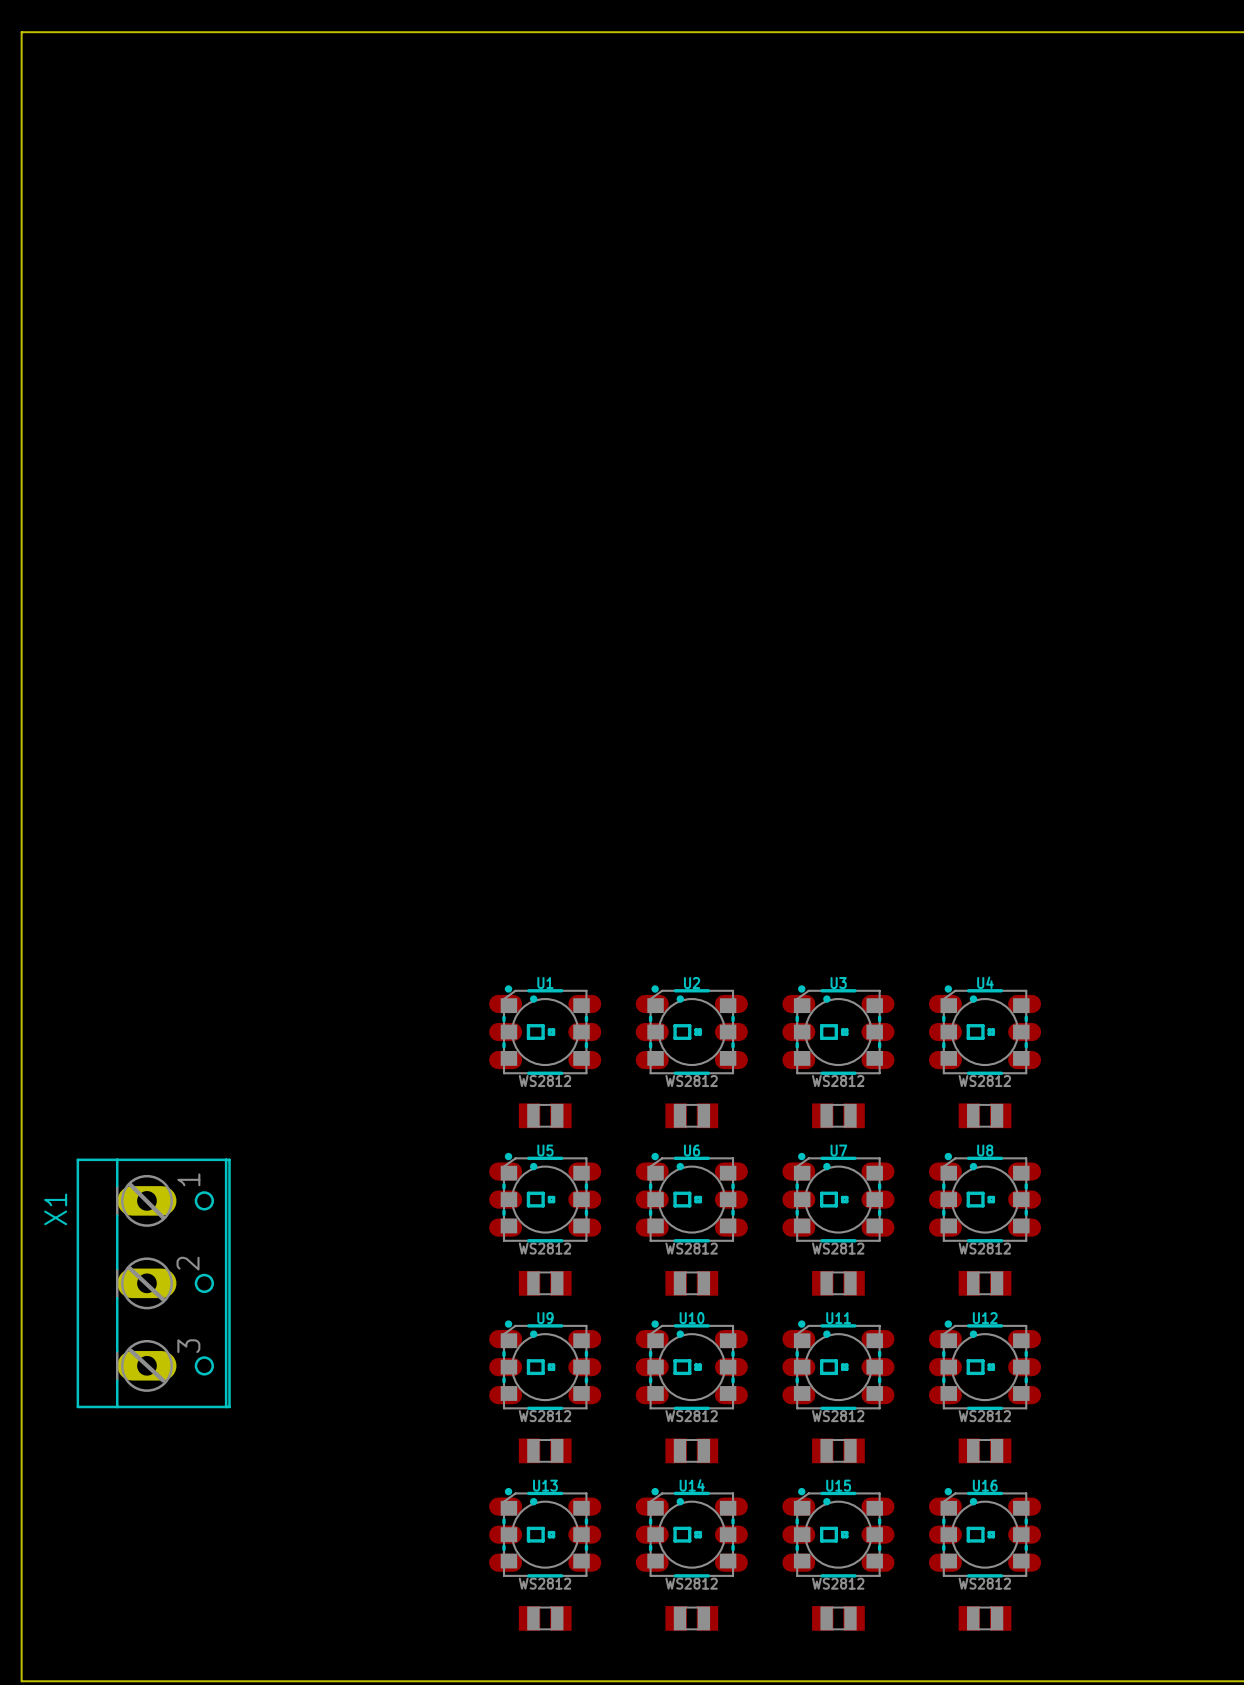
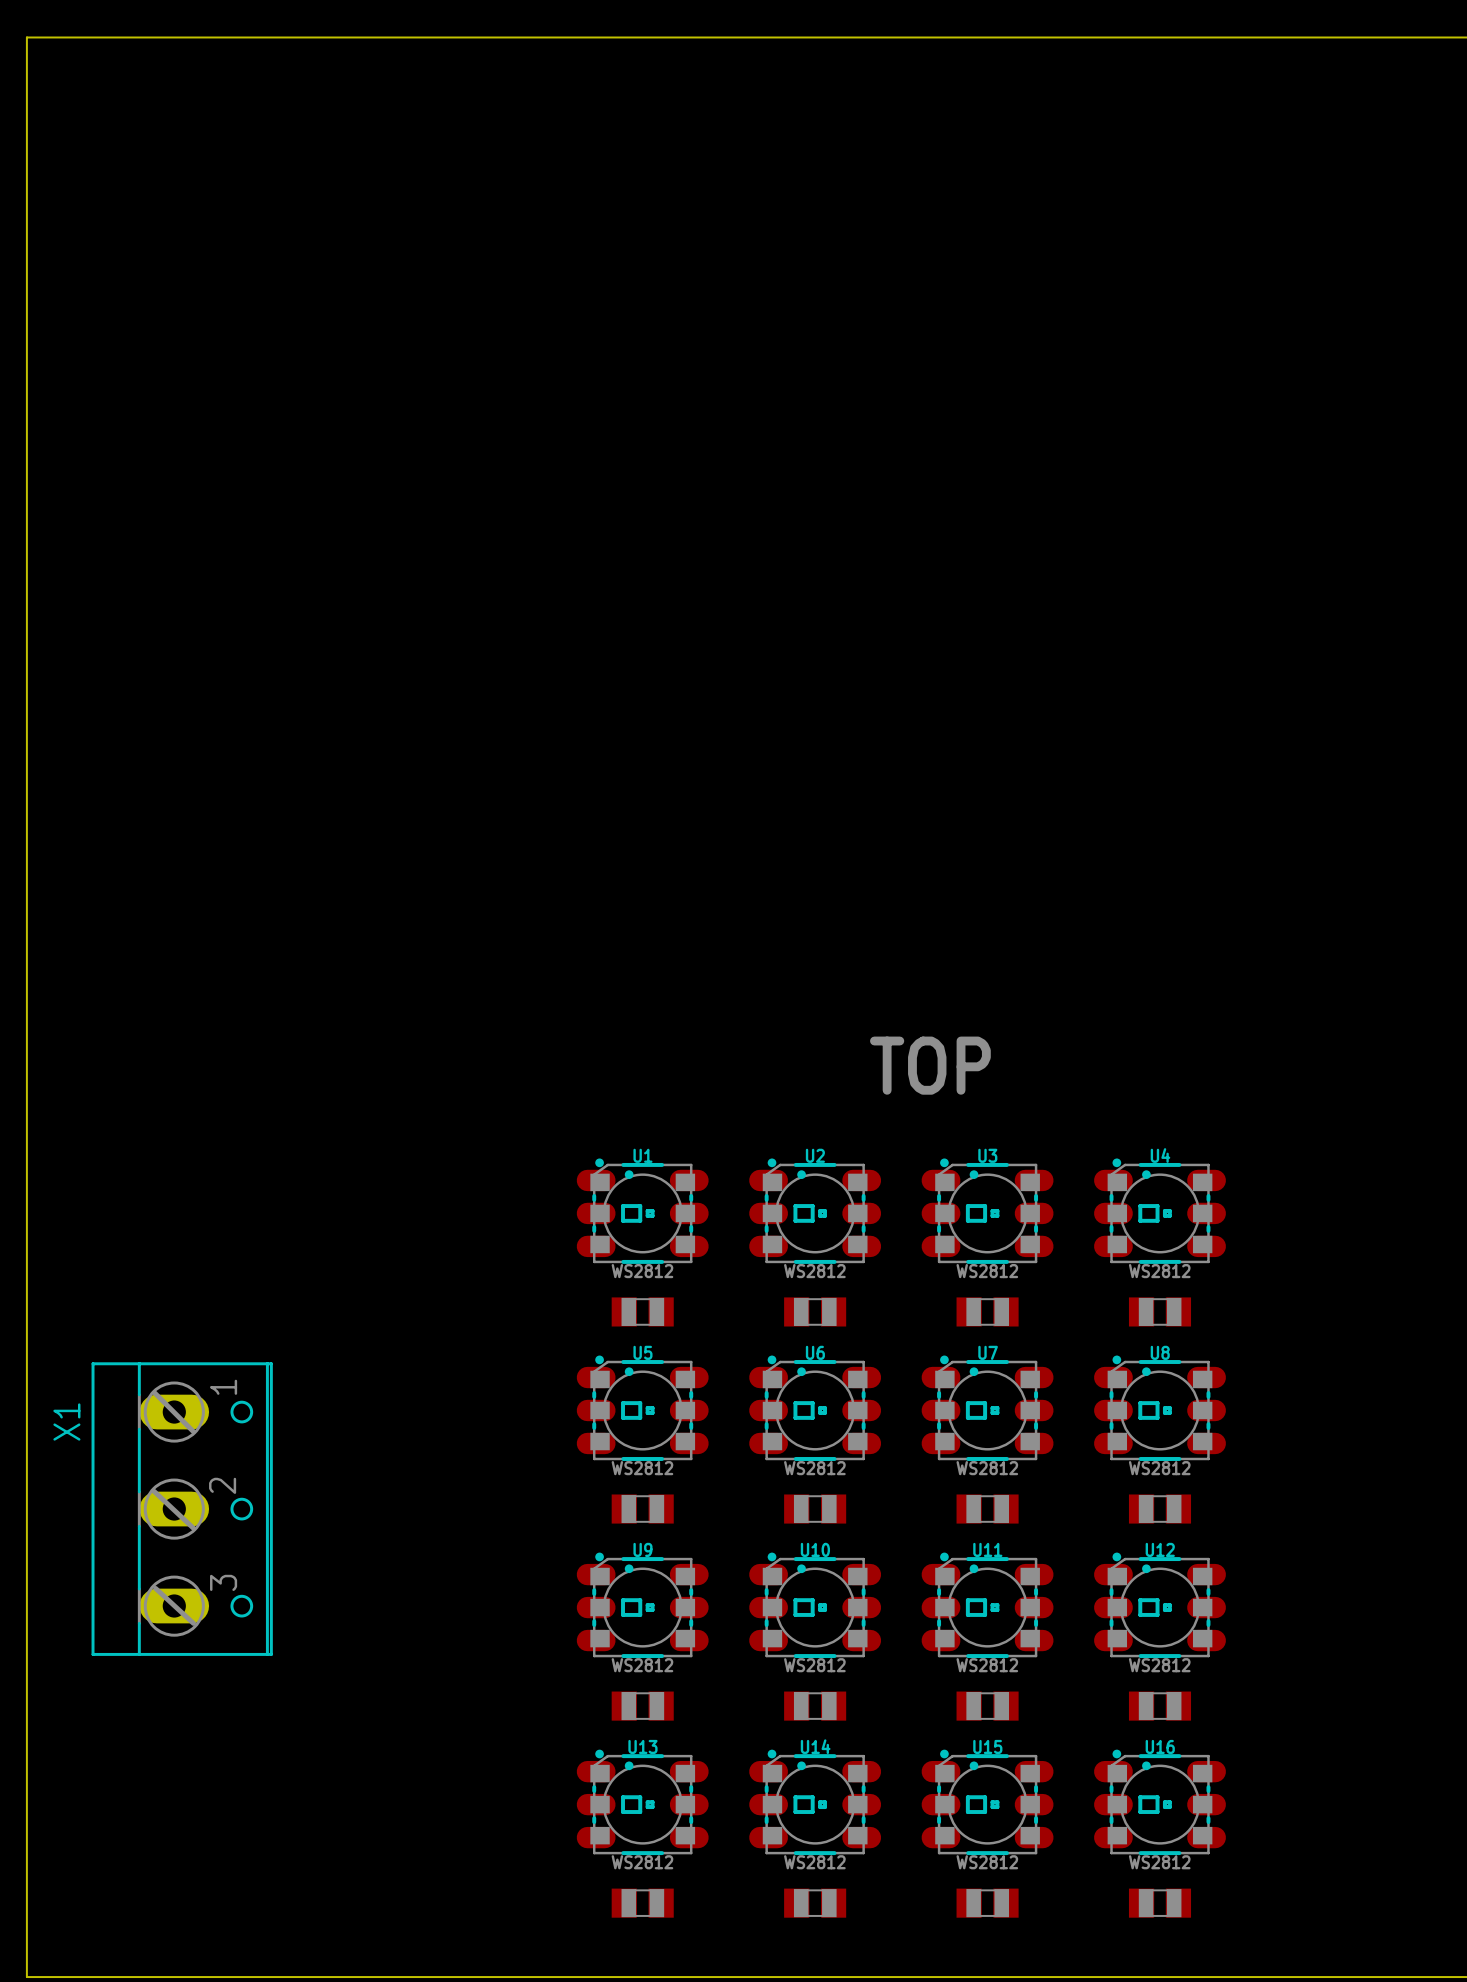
text: none -> TOP (930, 1065)

